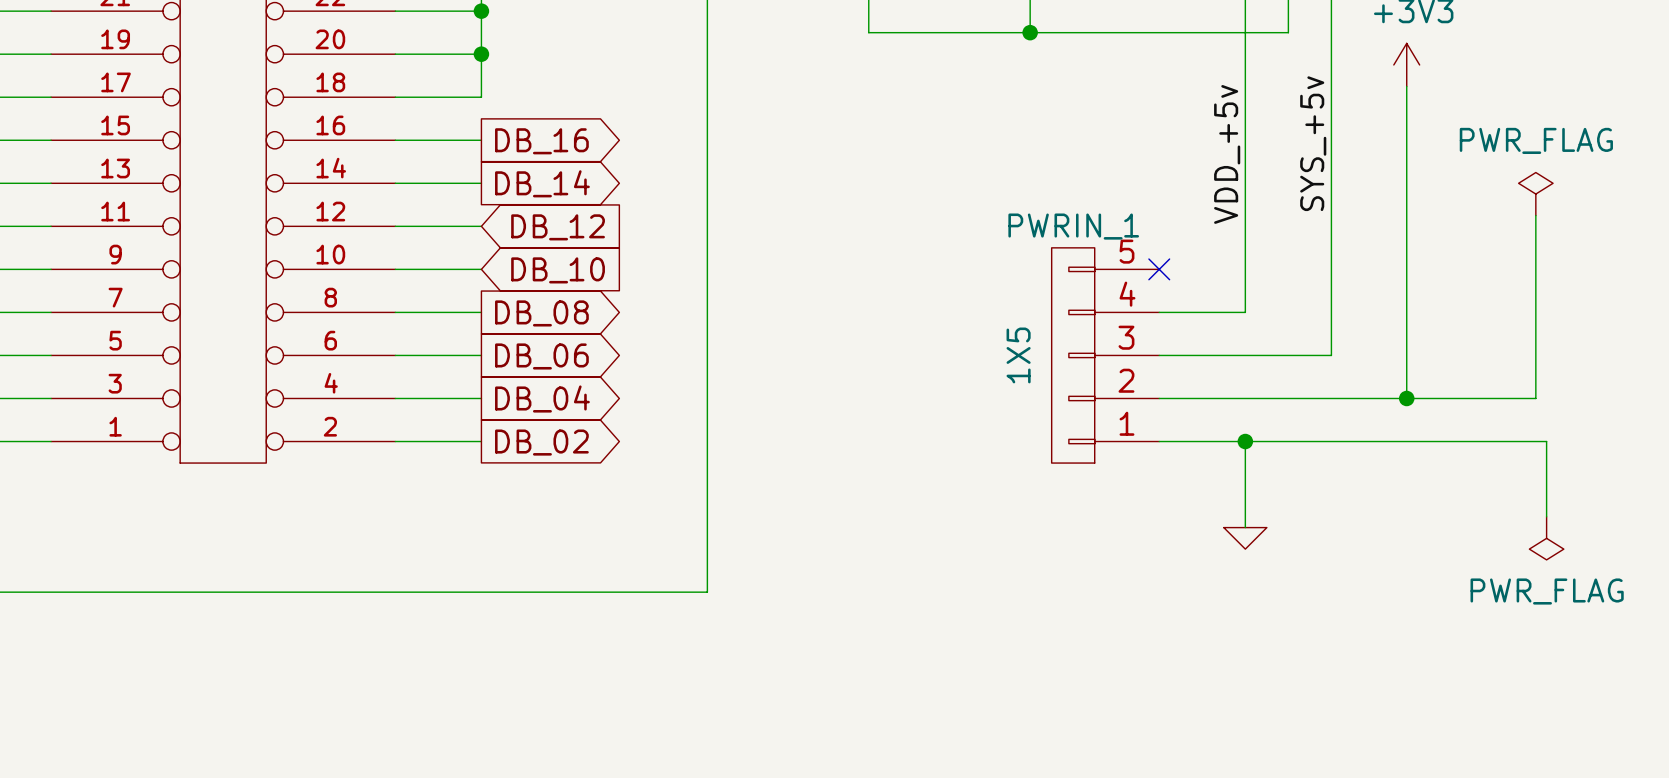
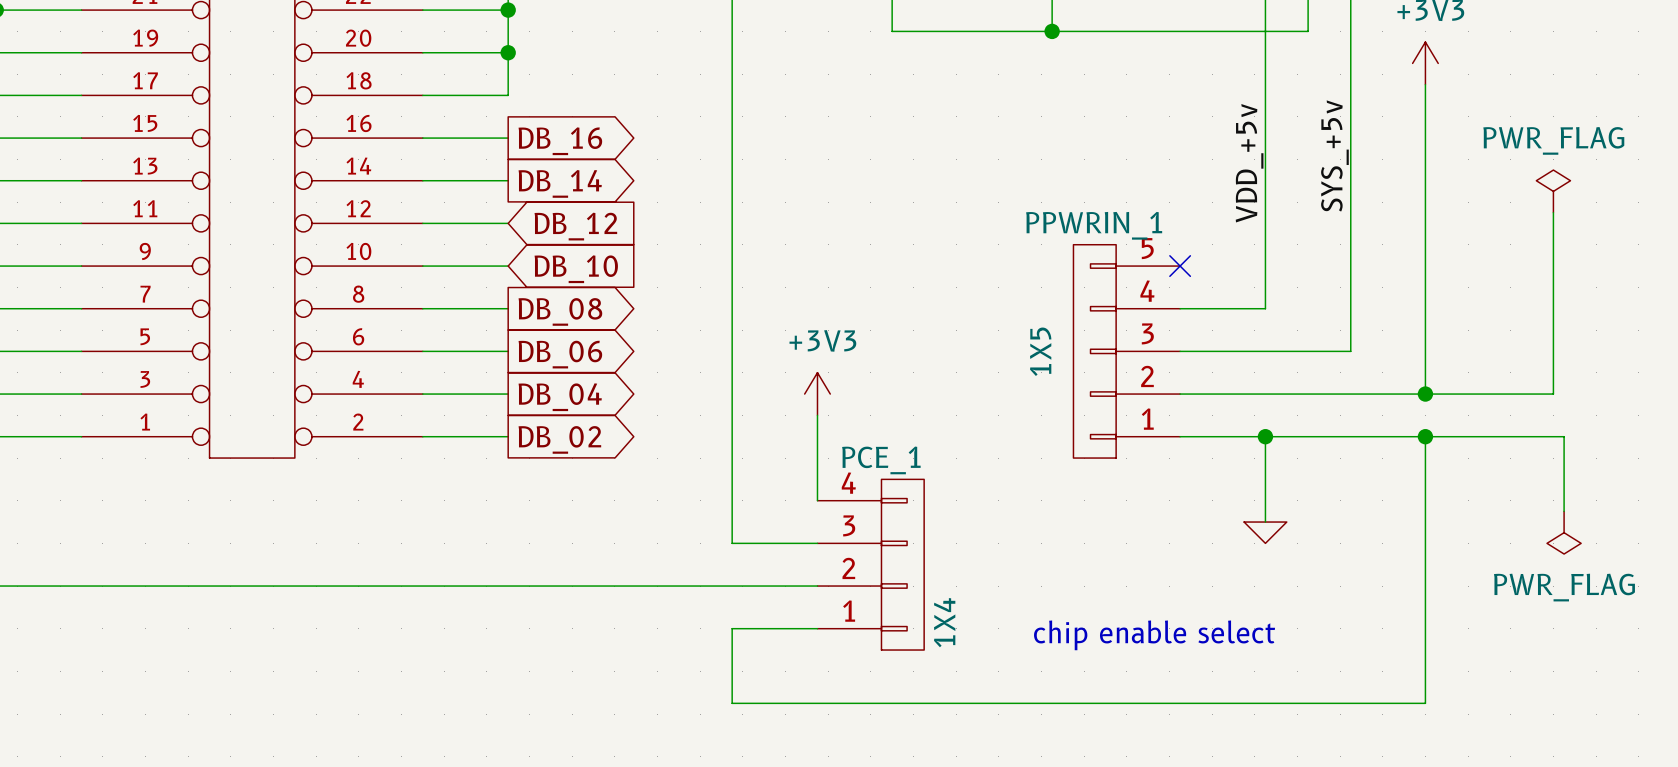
PWRIN_1 name: PWRIN_1 (1073, 226) -> PPWRIN_1 (1094, 225)
power symbol: none -> +3V3 (817, 394)
wire: none -> (817, 415) (817, 500)
wire: none -> (1425, 436) (1425, 703) (732, 703) (732, 628) (817, 628)
junction: none -> (1425, 436)
wire: (707, 549) (707, 592) -> (732, 543) (817, 543)
PCE_1: none -> 1X4 (870, 564)
wire: none -> (732, 586) (817, 586)
text: none -> chip enable select (1154, 635)

